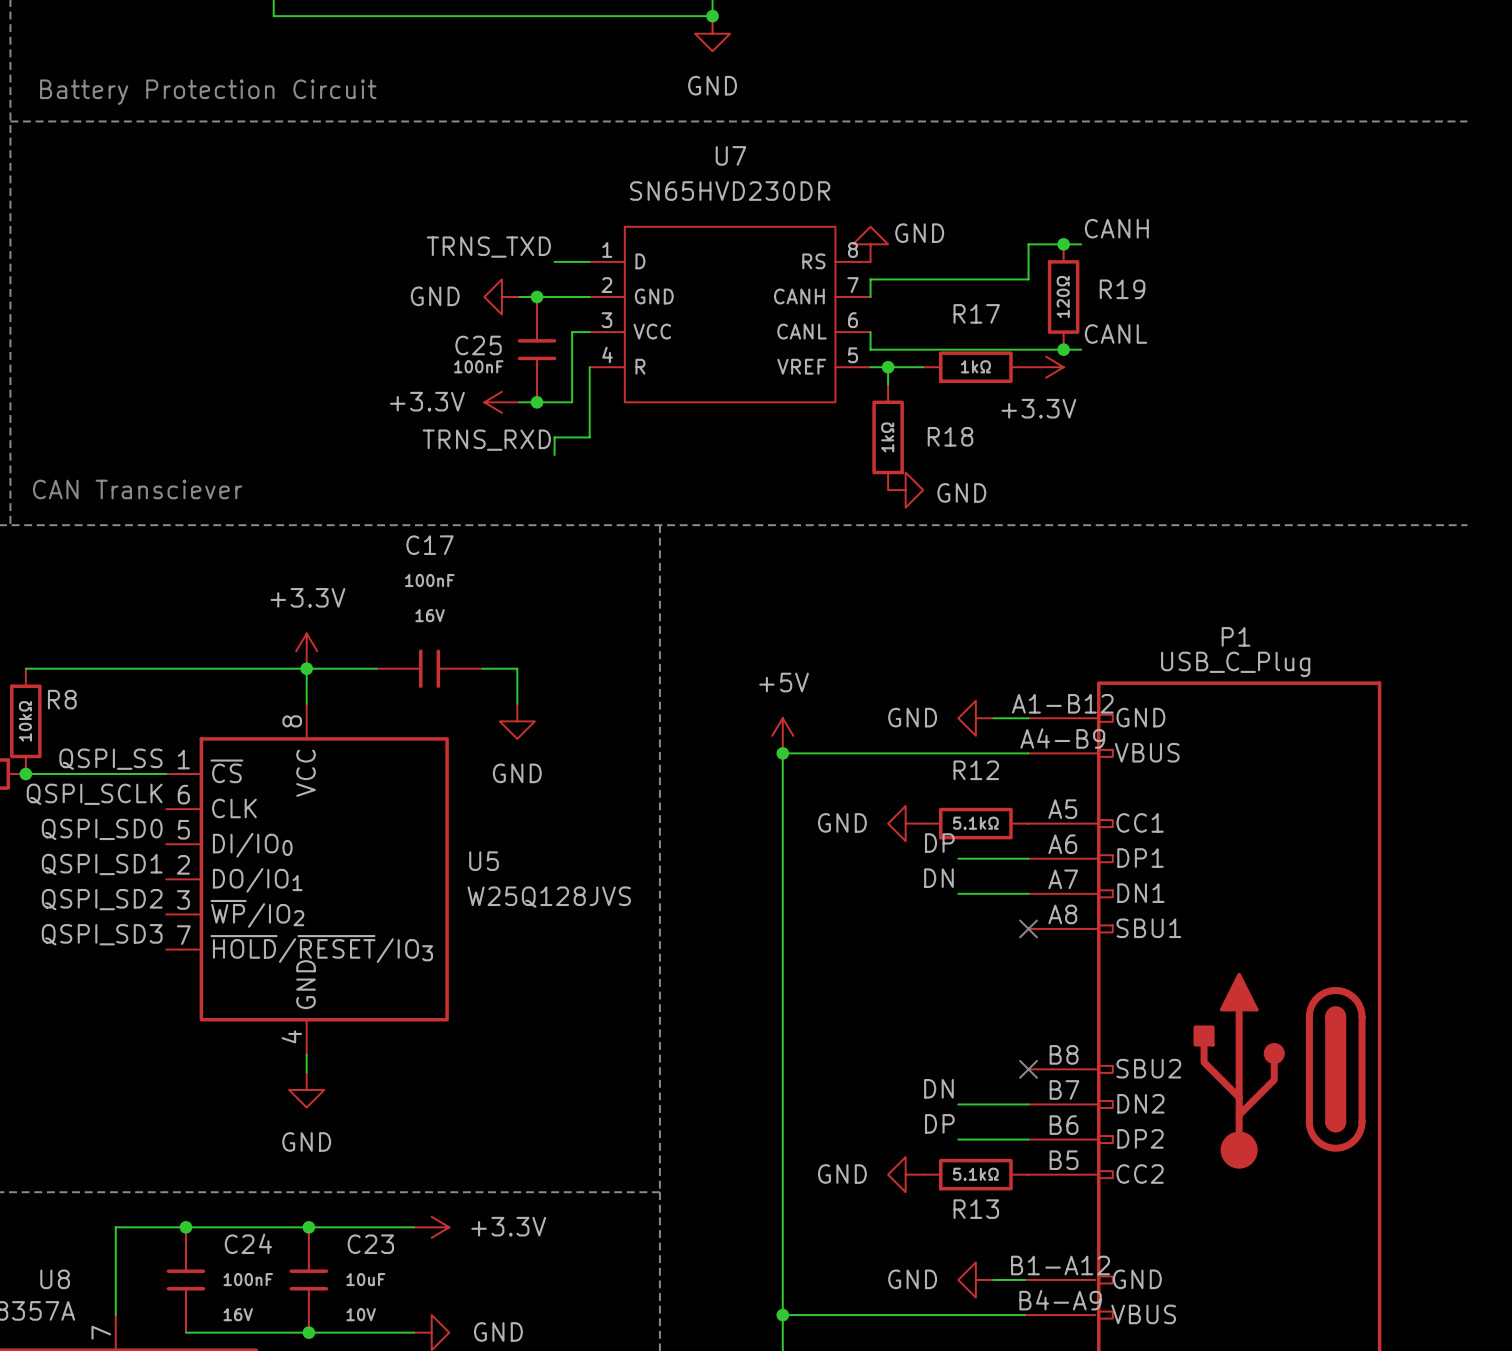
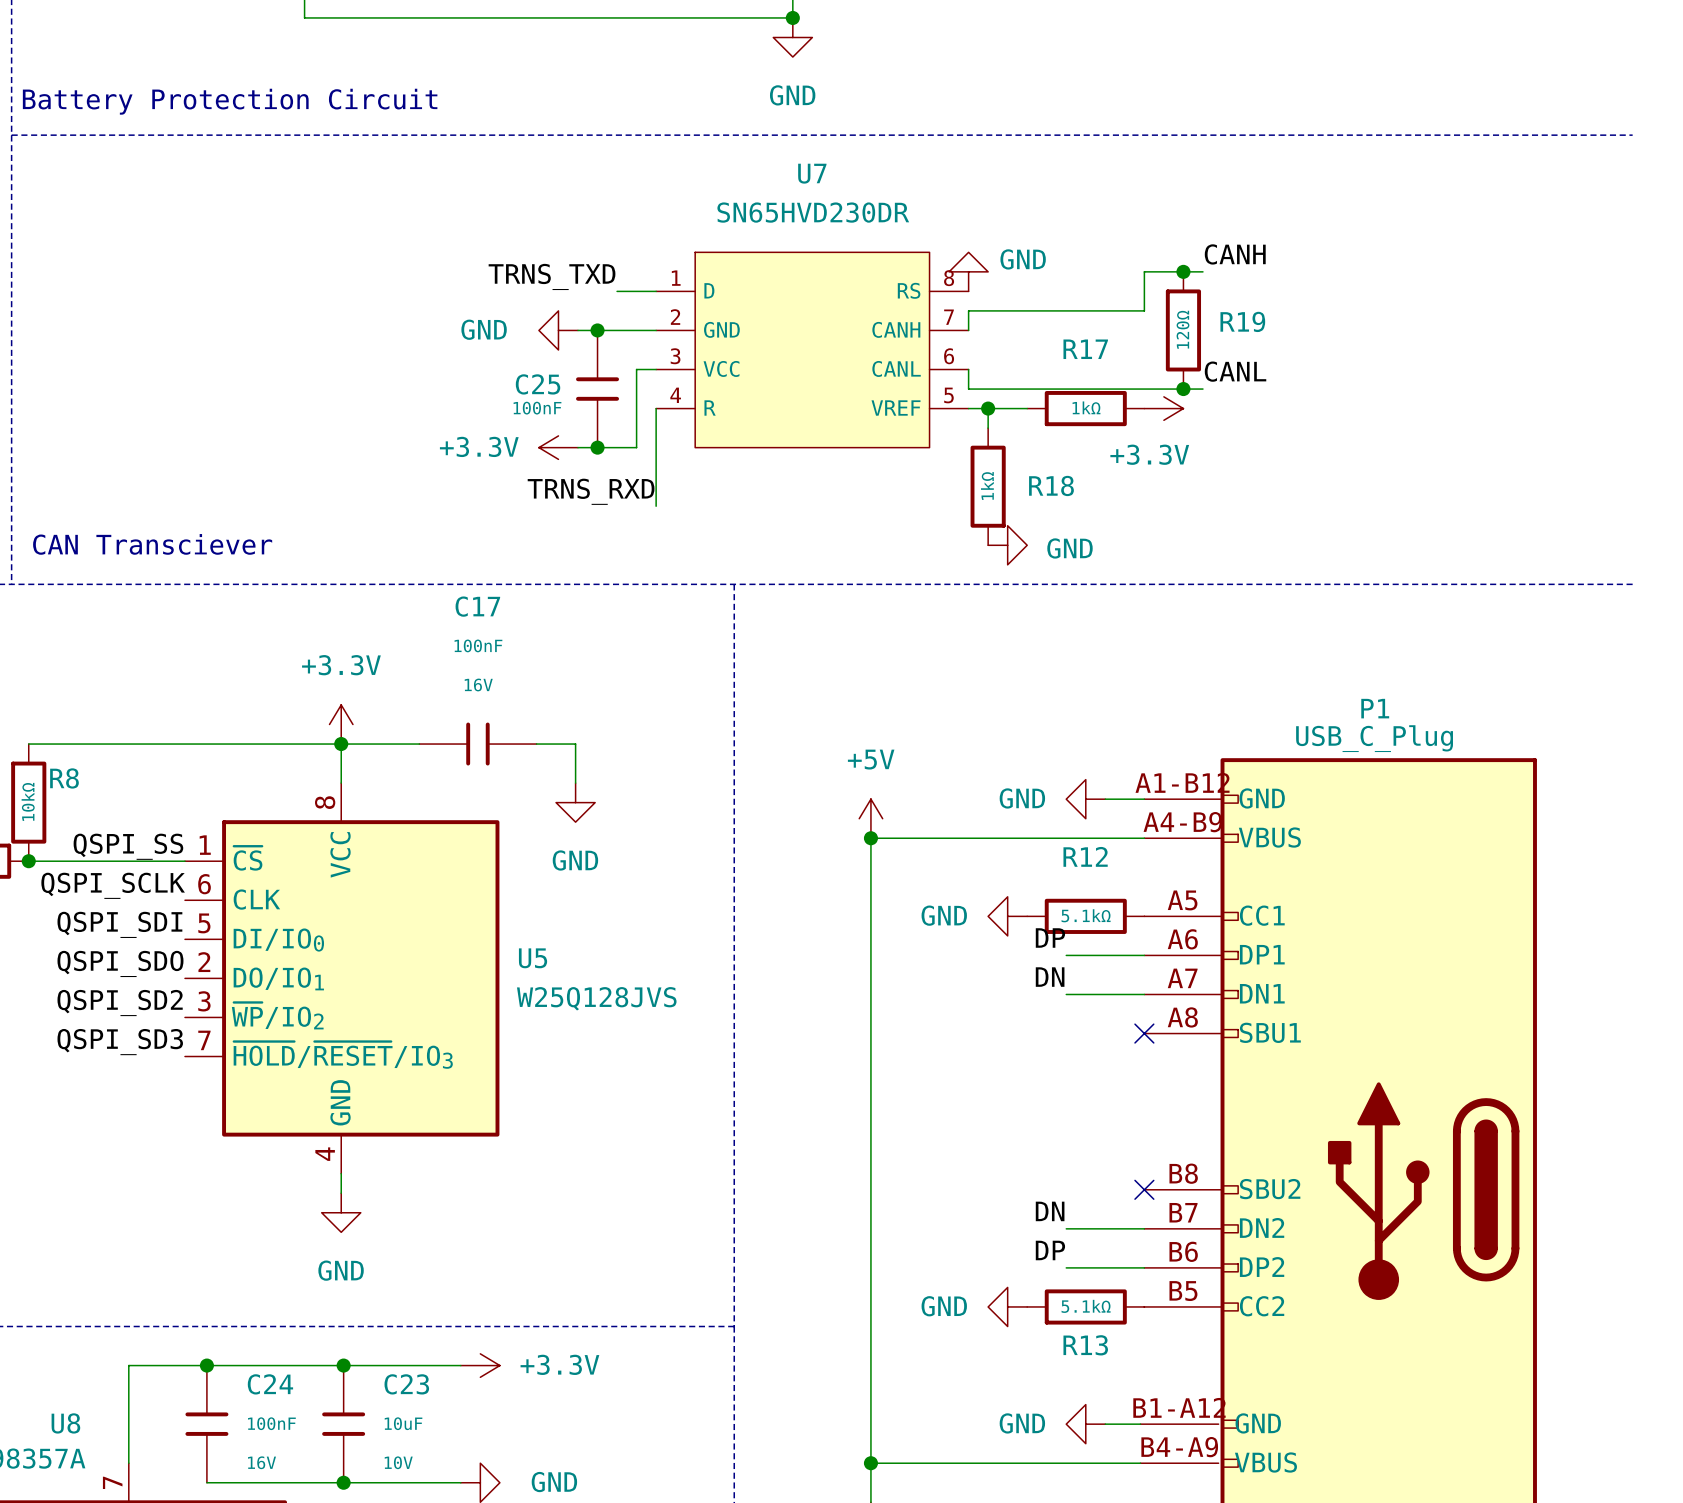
wire: (589, 437) (554, 437) (554, 454) -> (656, 486) (656, 506)
label position: TRNS_RXD (486, 440) -> TRNS_RXD (591, 491)
label: QSPI_SD0 (102, 829) -> QSPI_SDI (119, 924)
label: QSPI_SD1 (102, 864) -> QSPI_SDO (120, 963)

